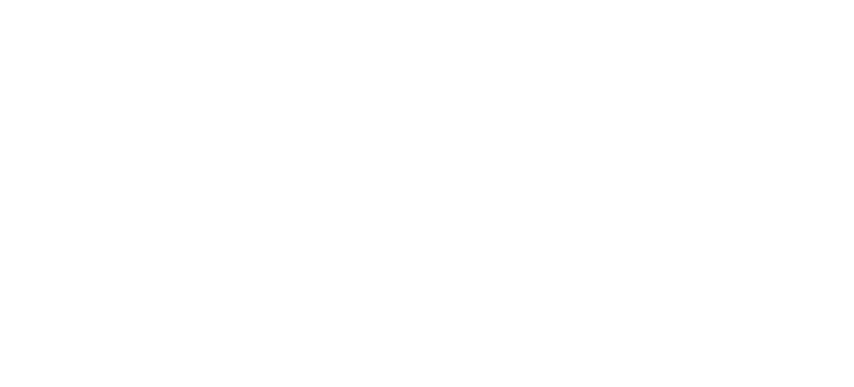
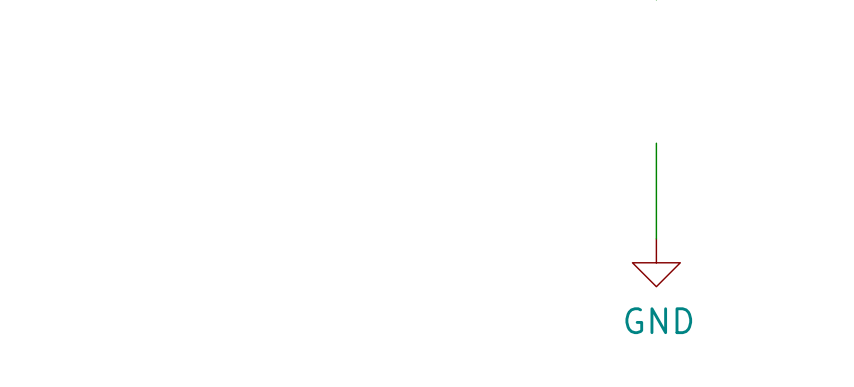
wire: none -> (656, 143) (656, 238)
power symbol: none -> GND (656, 262)

